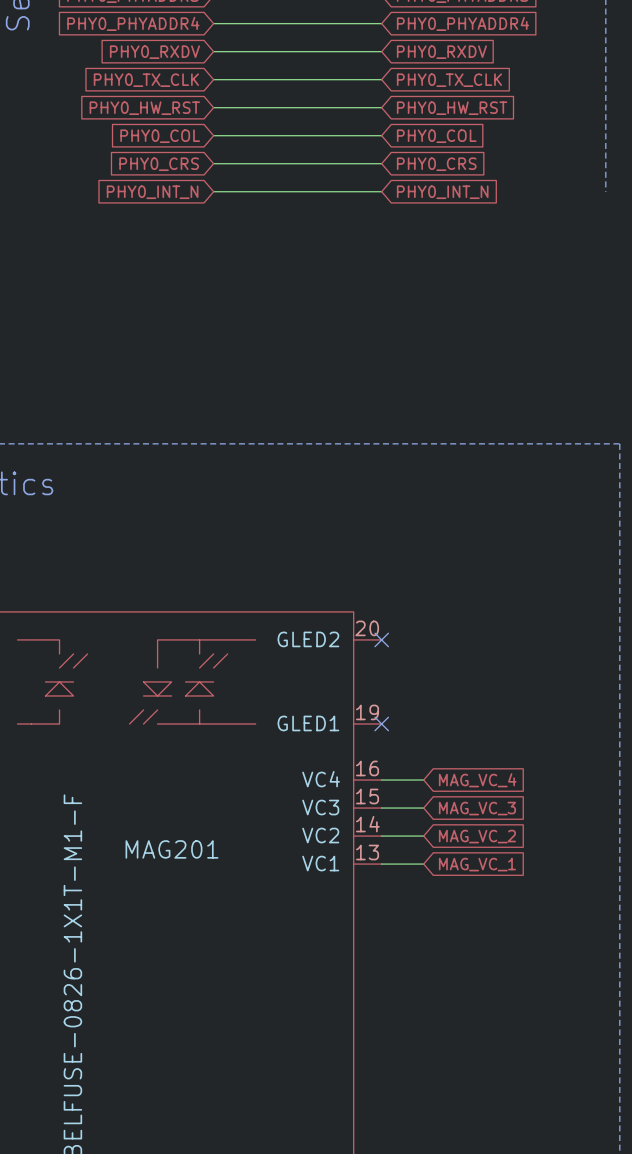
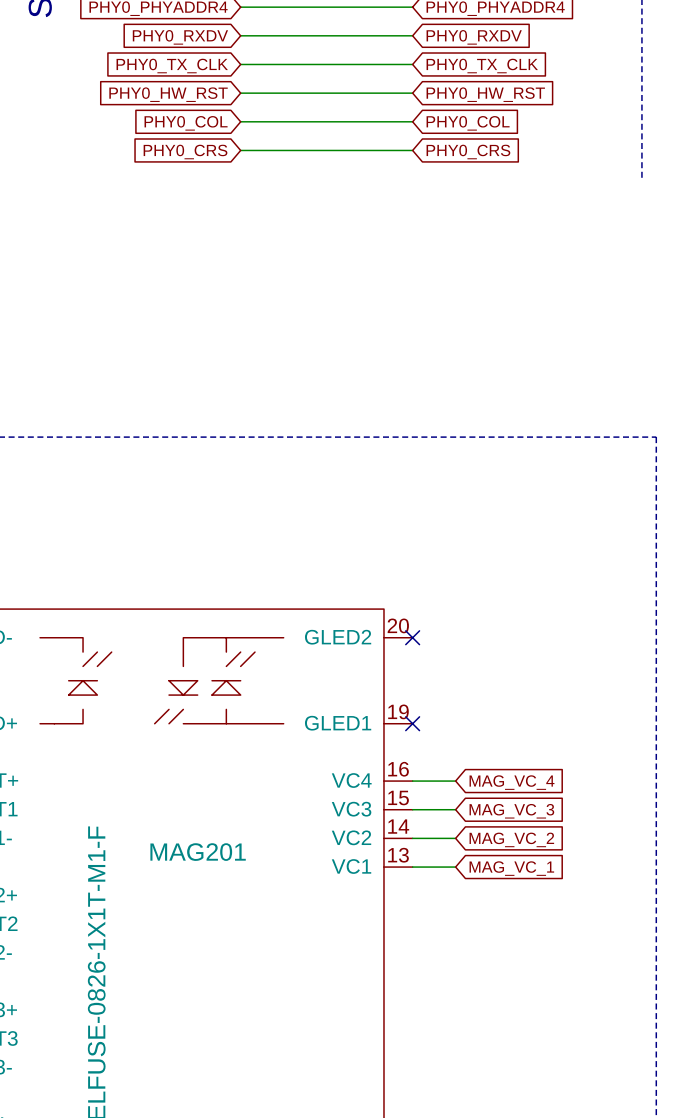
wire: (213, 191) (381, 191) -> none
global label: PHY0_INT_N (152, 192) -> none
global label: PHY0_INT_N (442, 192) -> none

